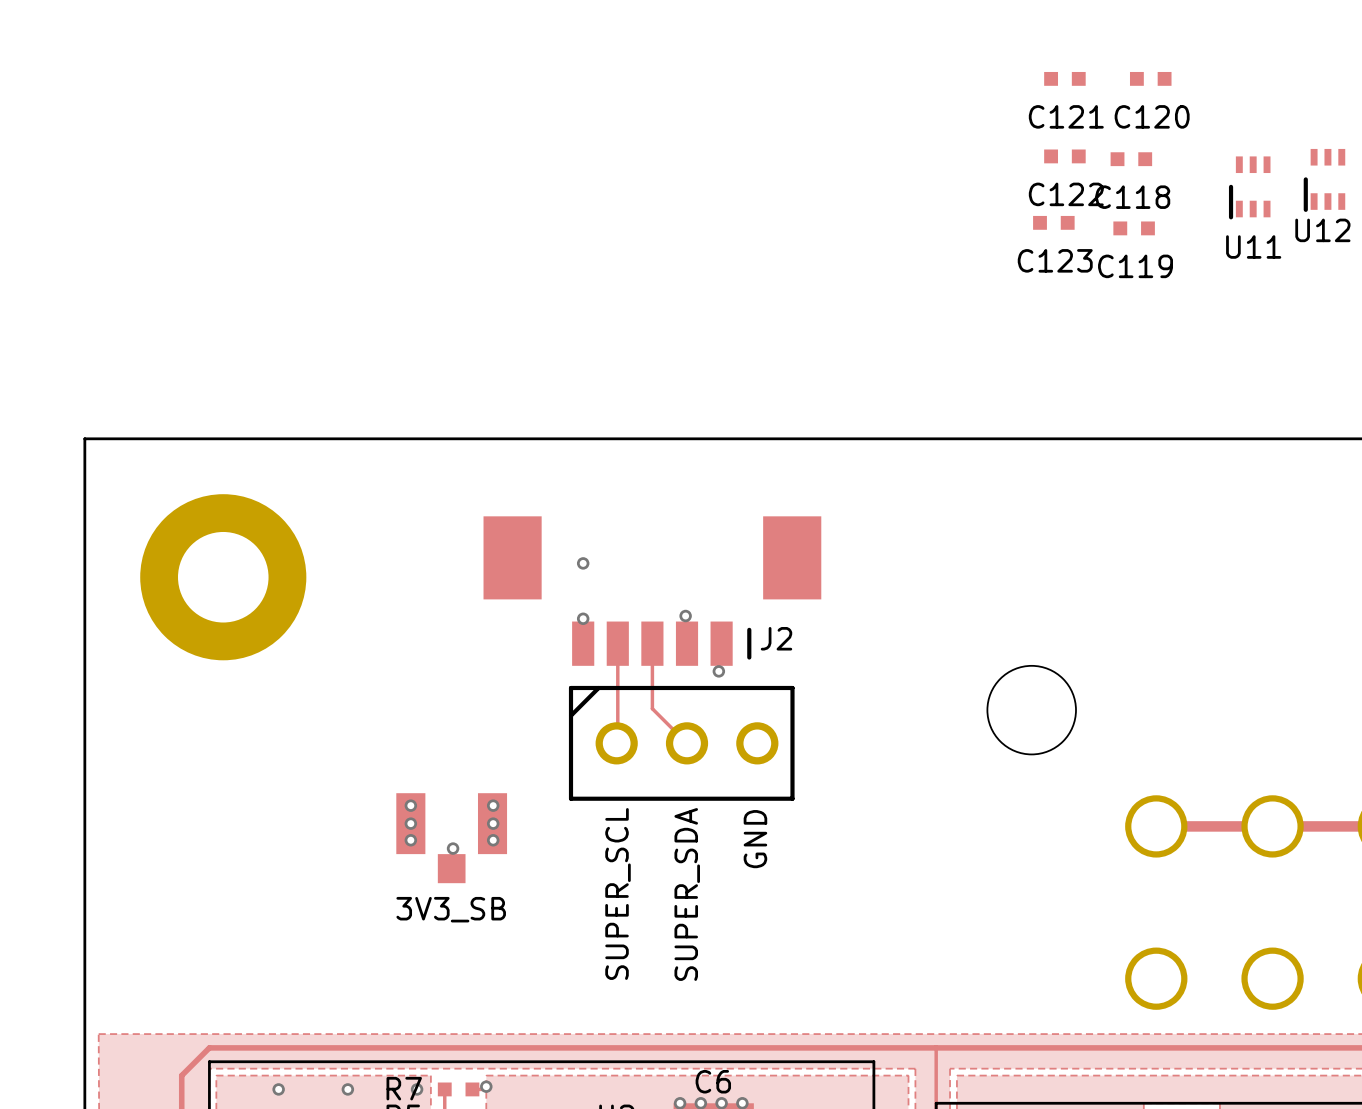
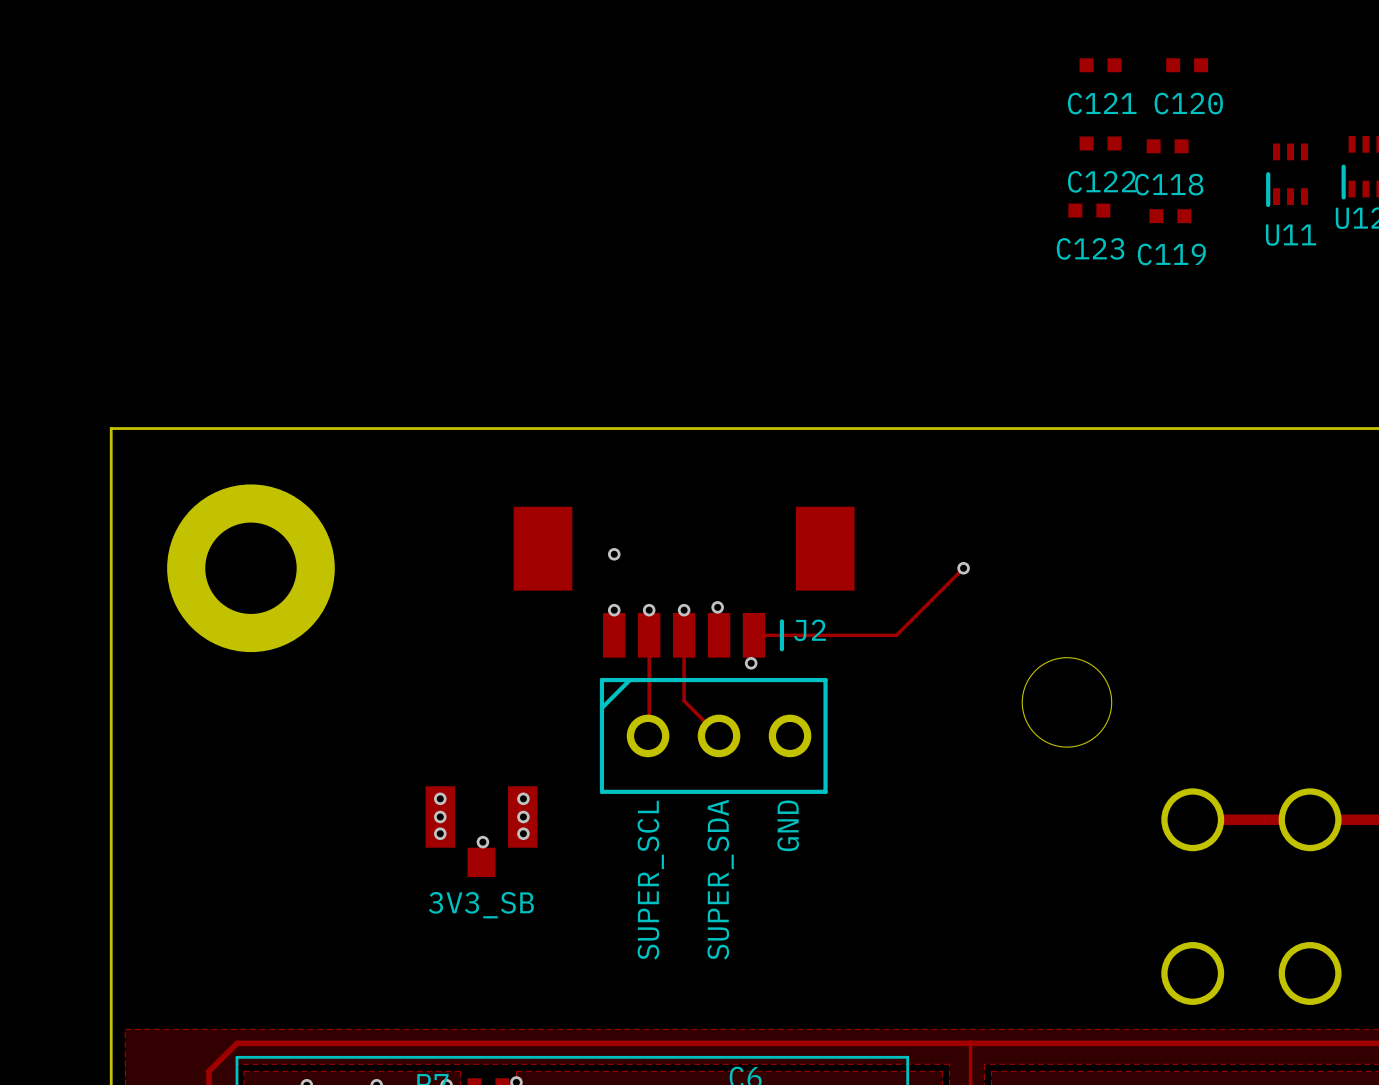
track: none -> (963, 568) (896, 635) (753, 635)
via: none -> (963, 568)
via: none -> (649, 610)
via: none -> (684, 610)

